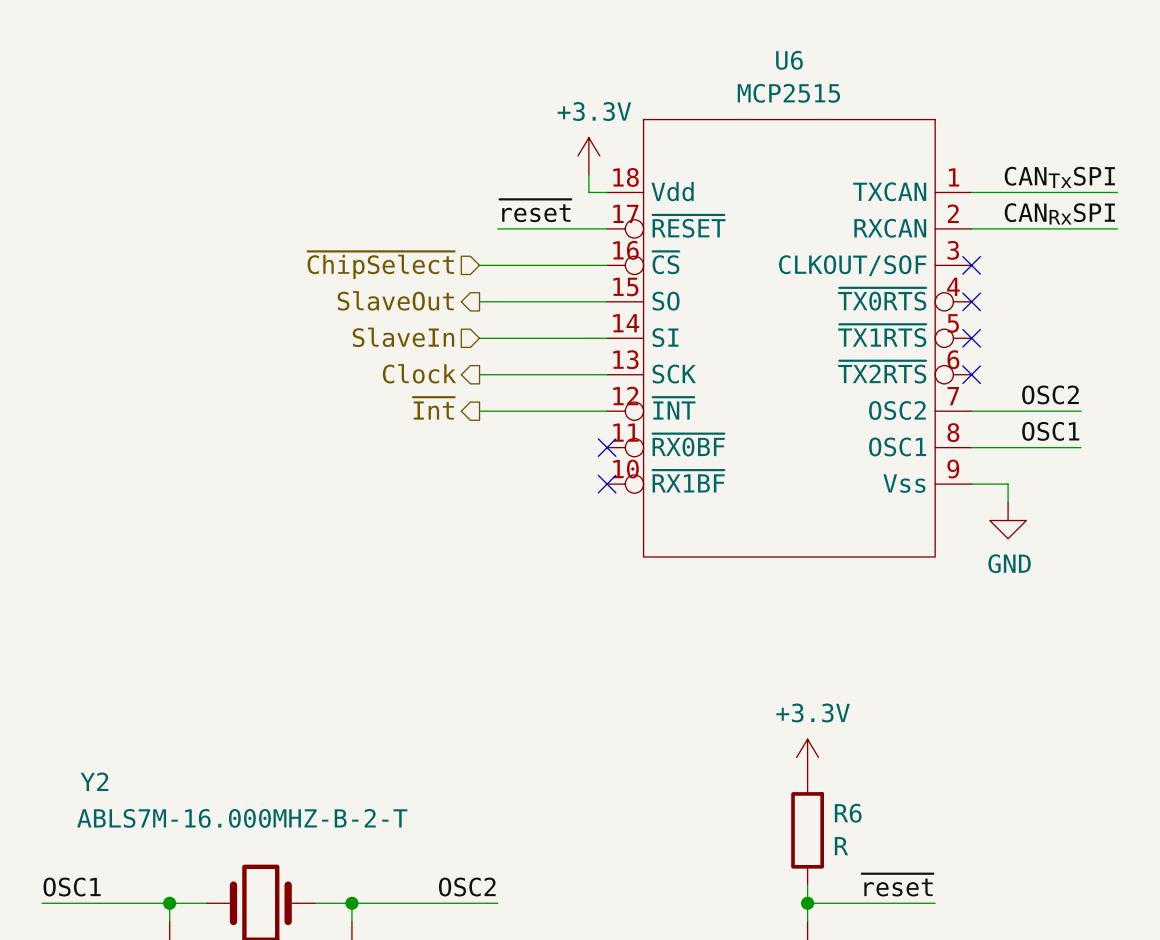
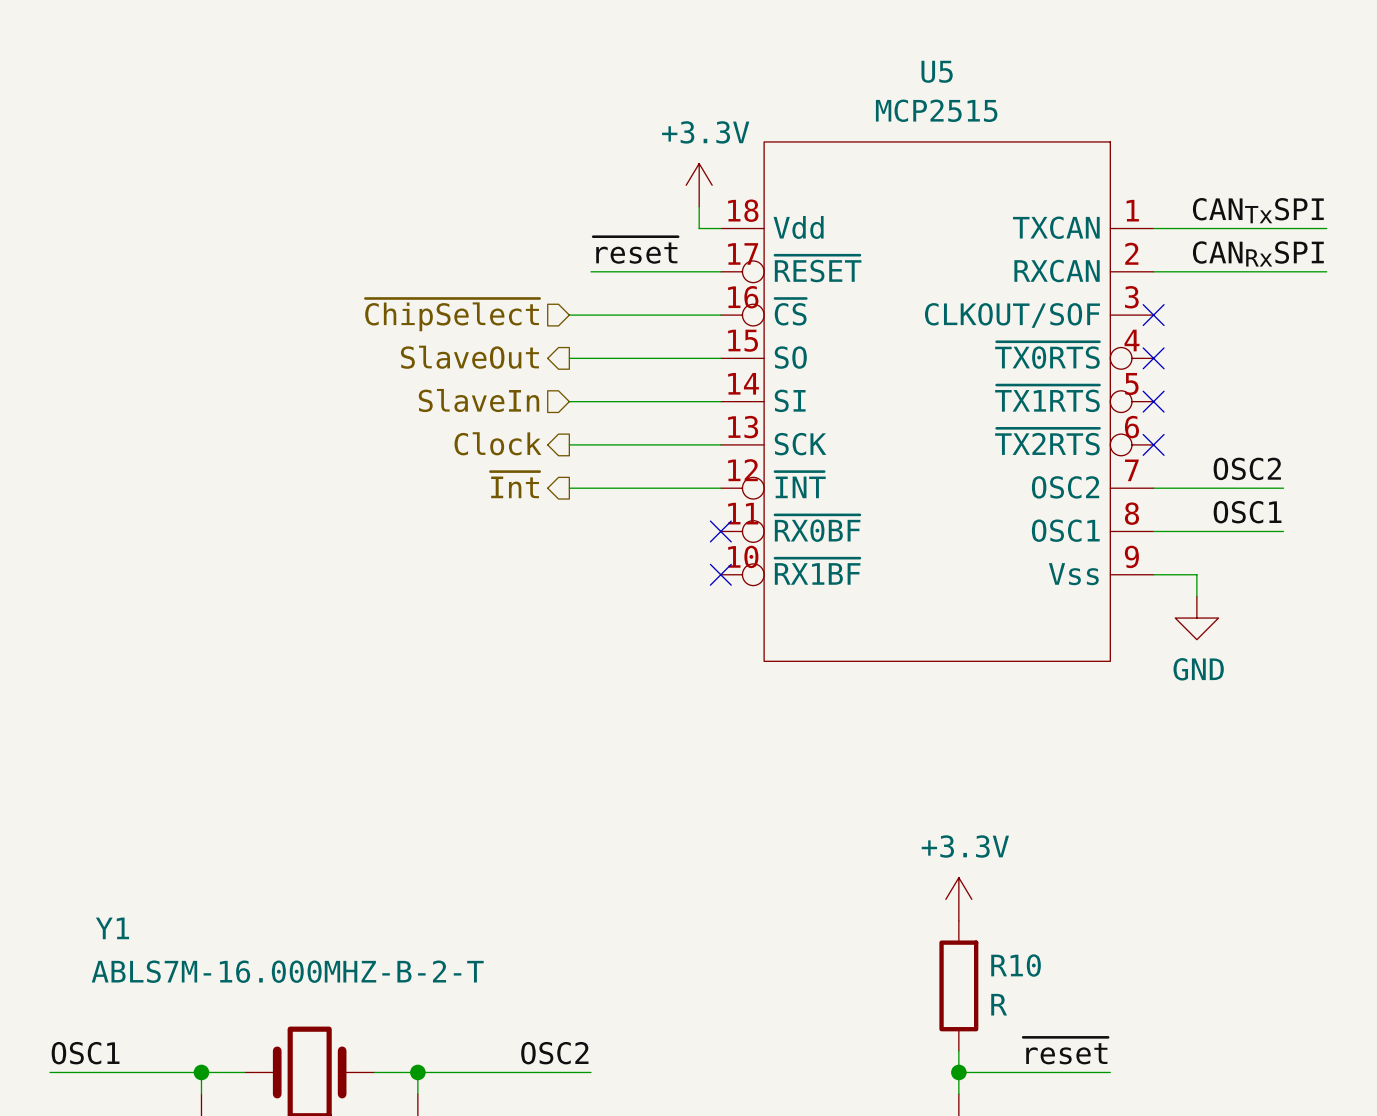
U6 name: U6 (789, 60) -> U5 (937, 71)
Y2 name: Y2 (94, 781) -> Y1 (112, 928)
R6 name: R6 (848, 813) -> R10 (1016, 965)

